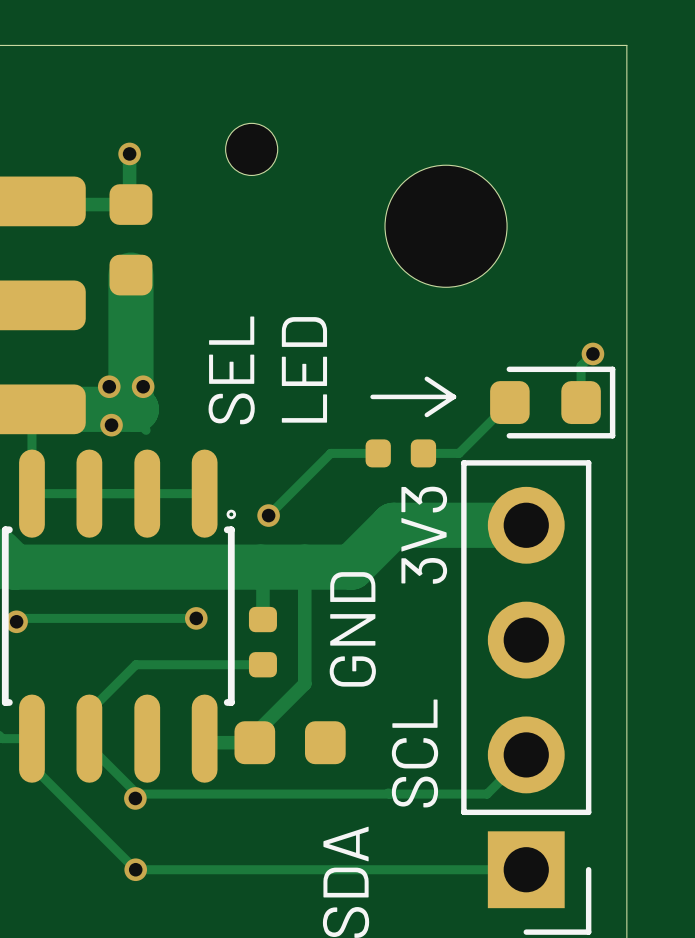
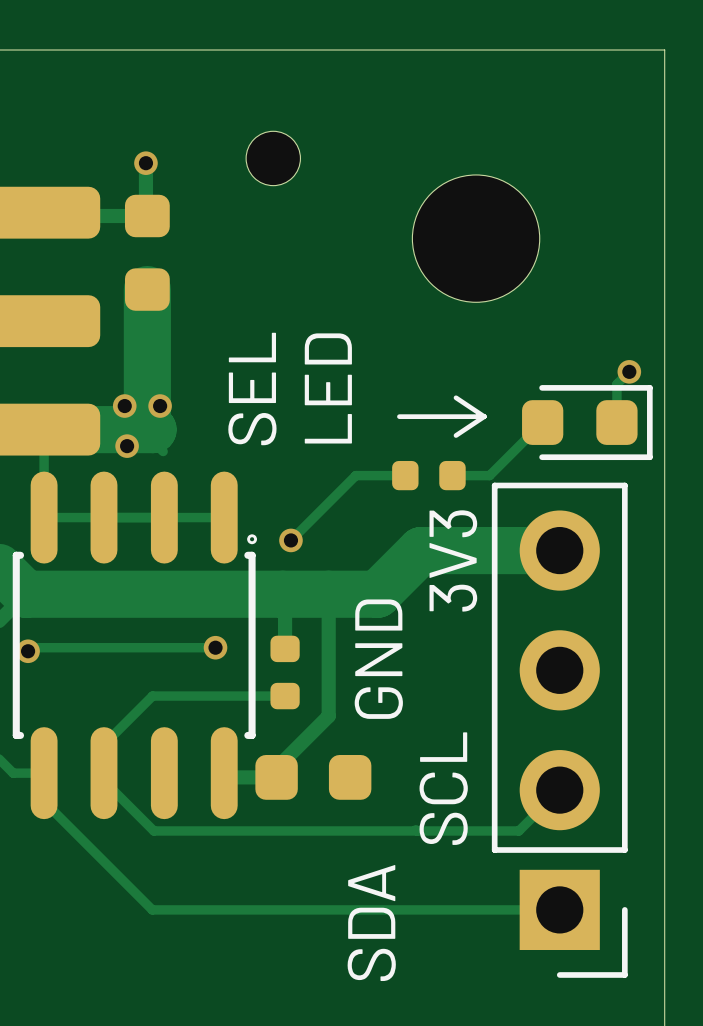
via: (135, 798) -> none
via: (135, 869) -> none

